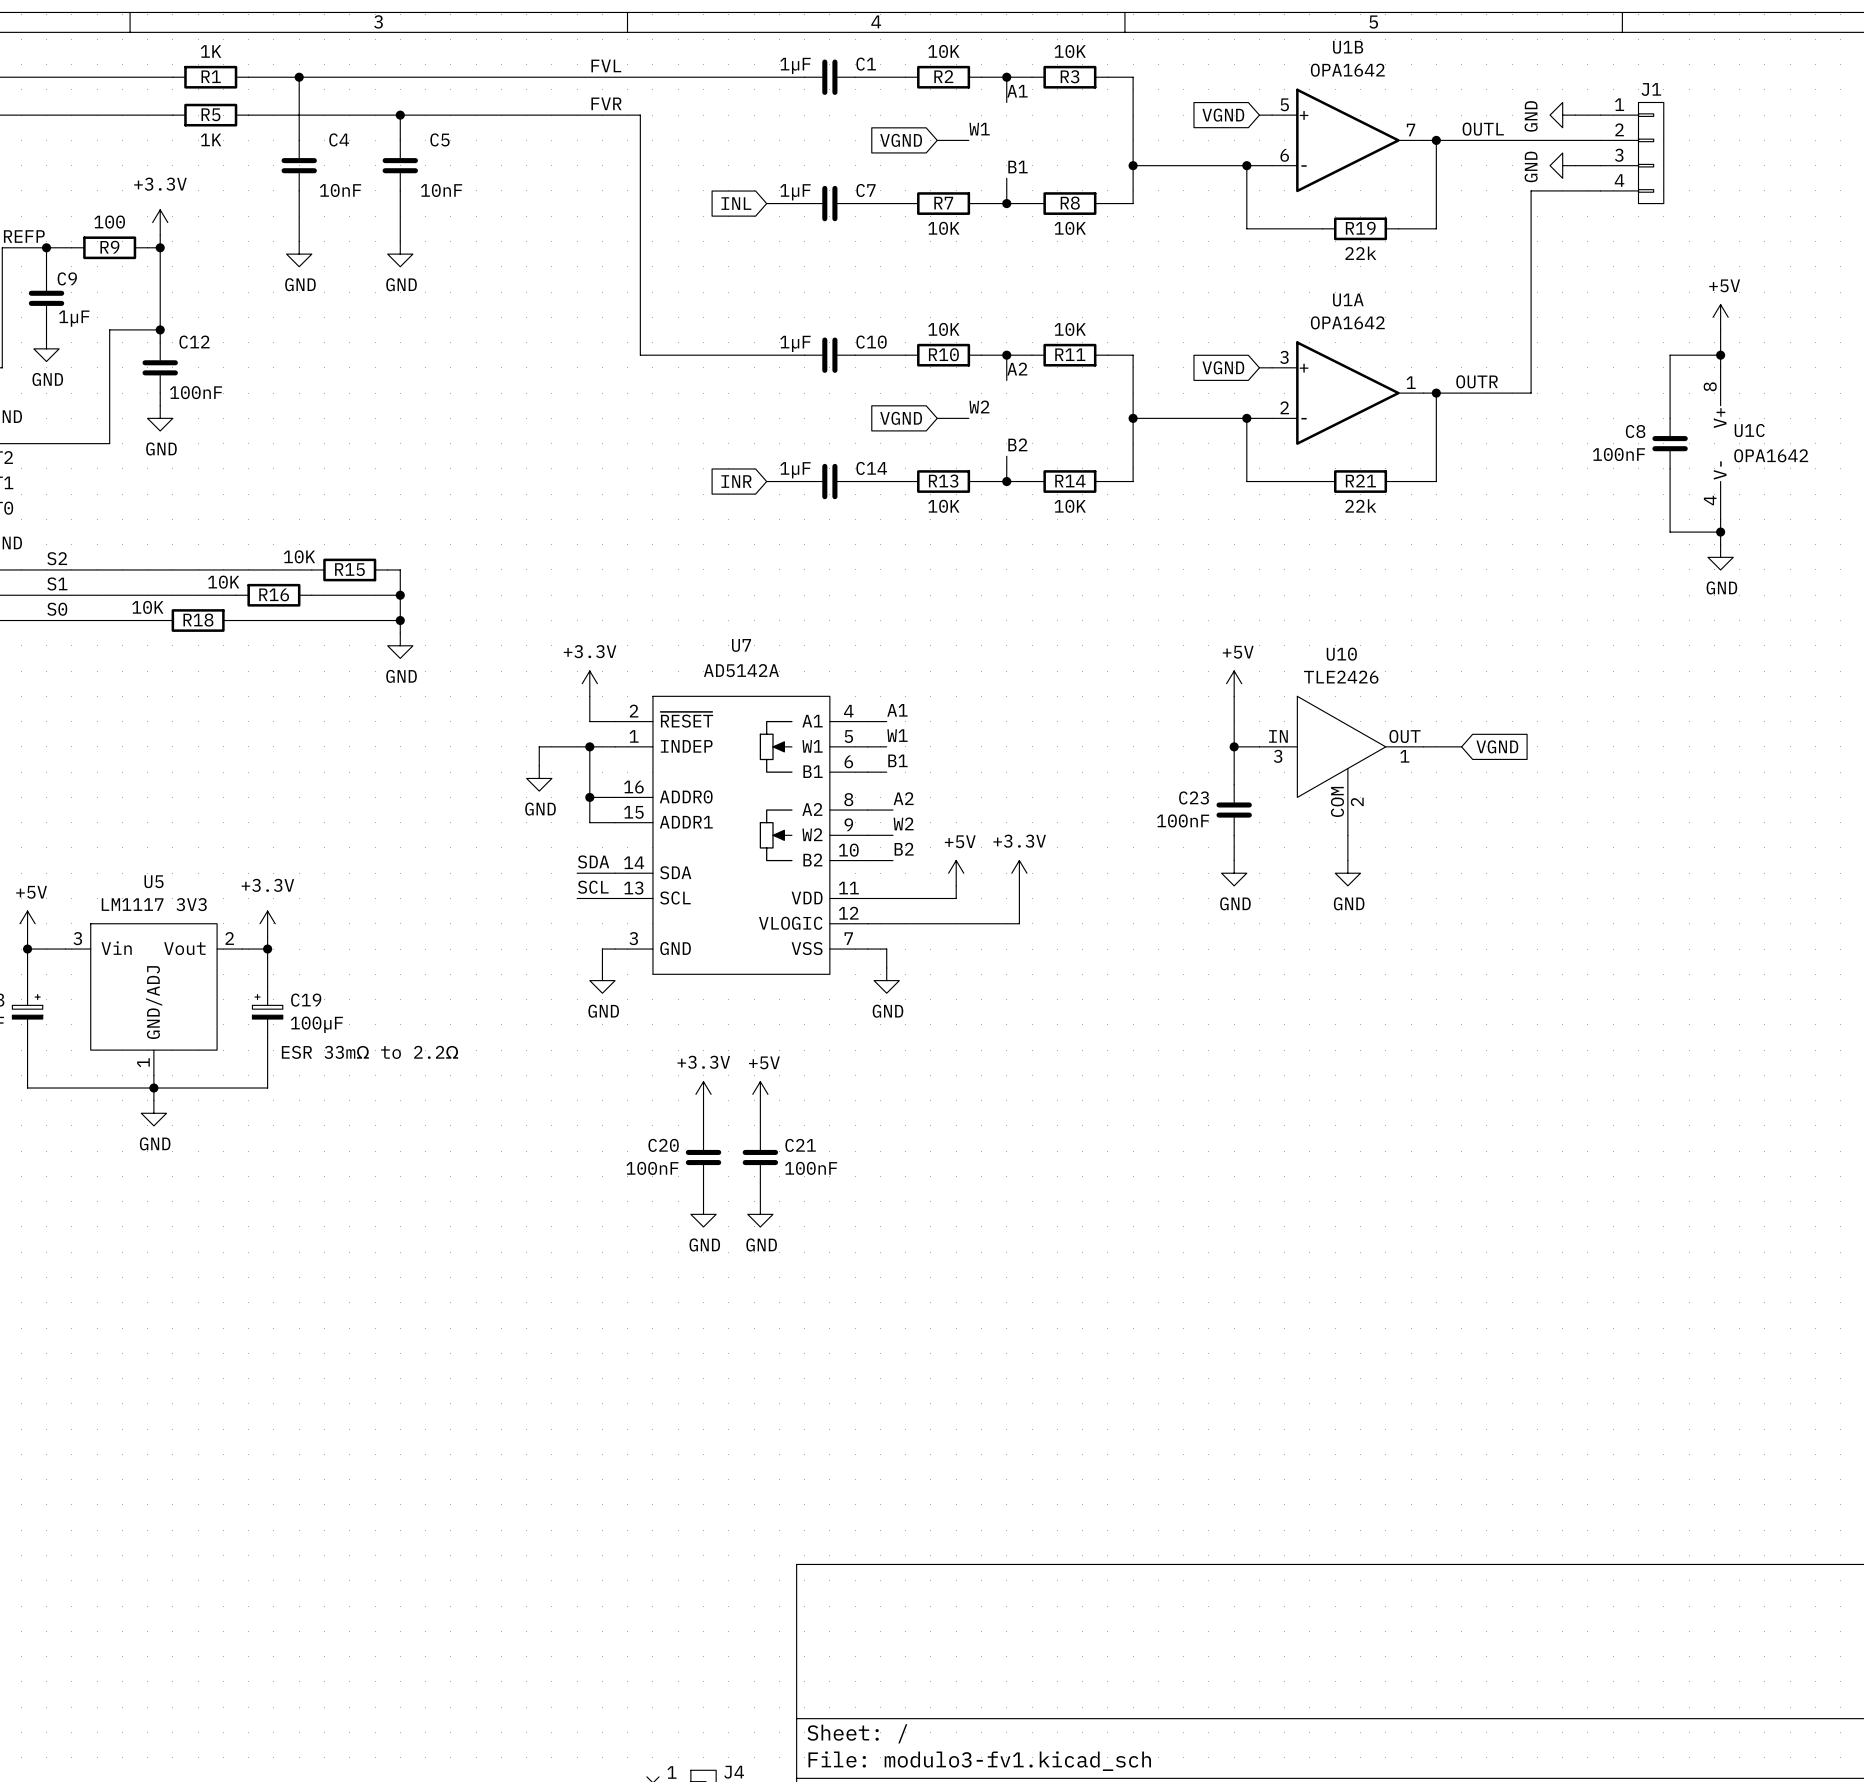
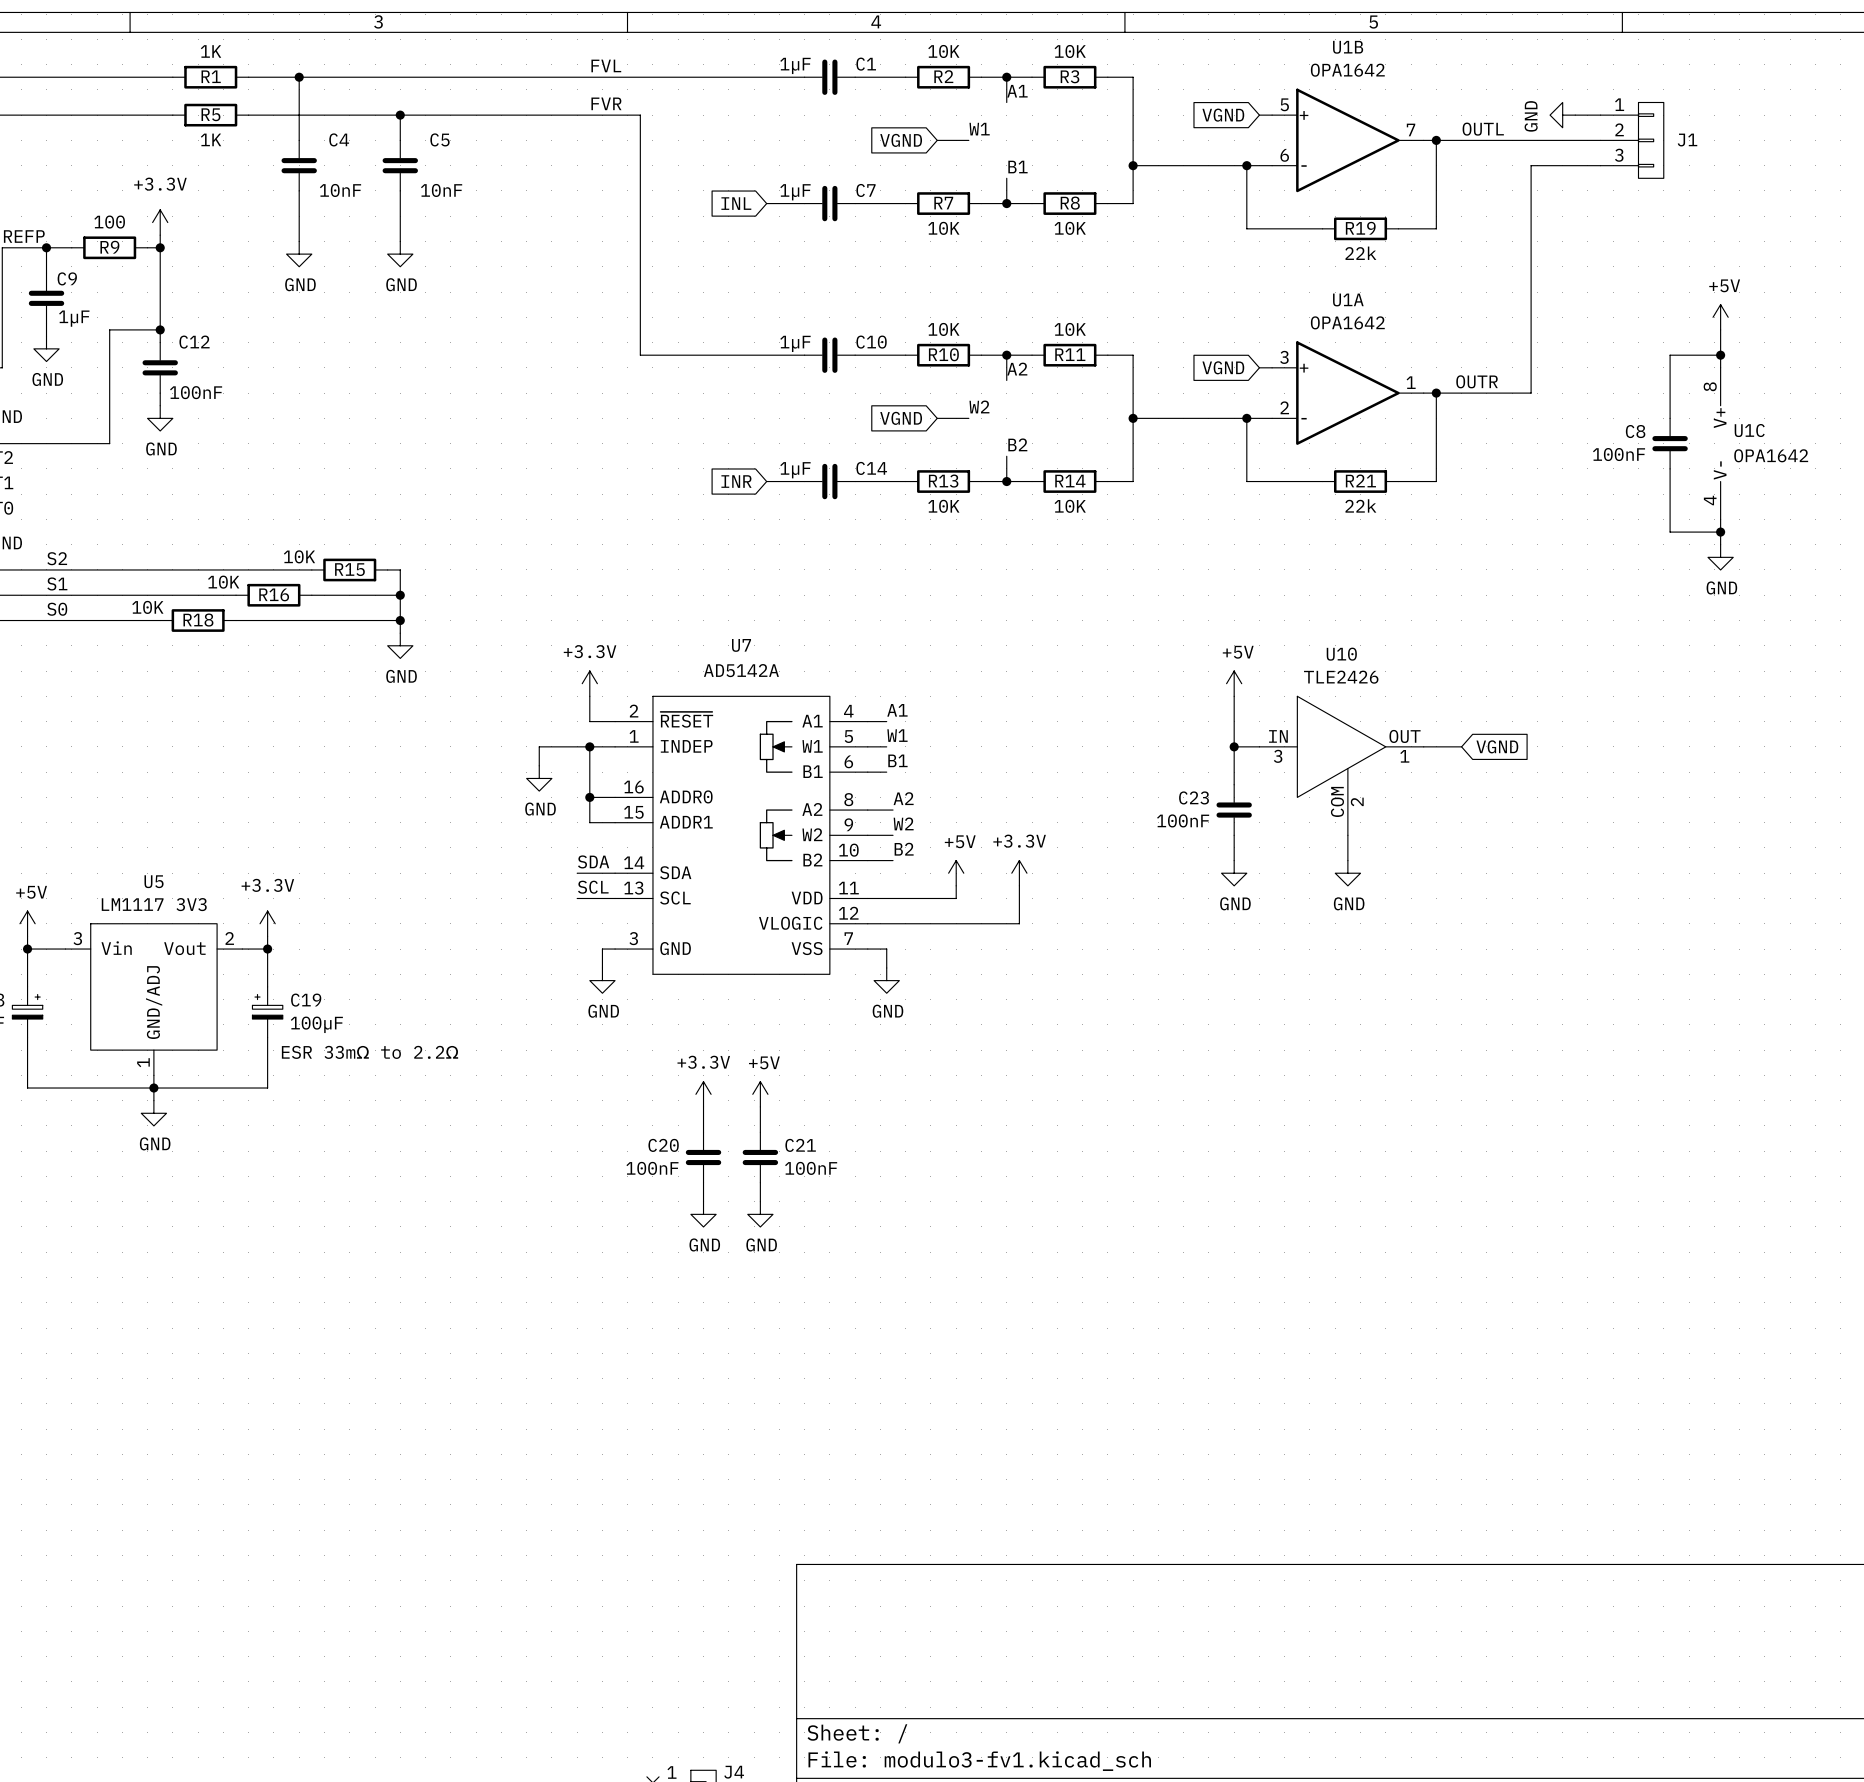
J1 name position: J1 (1651, 89) -> J1 (1687, 140)
J1 symbol: [1600, 102, 1664, 204] -> [1600, 102, 1664, 179]
power symbol: GND (1562, 165) -> none
wire: (1531, 190) (1600, 190) -> (1531, 190) (1531, 165) (1575, 165)

